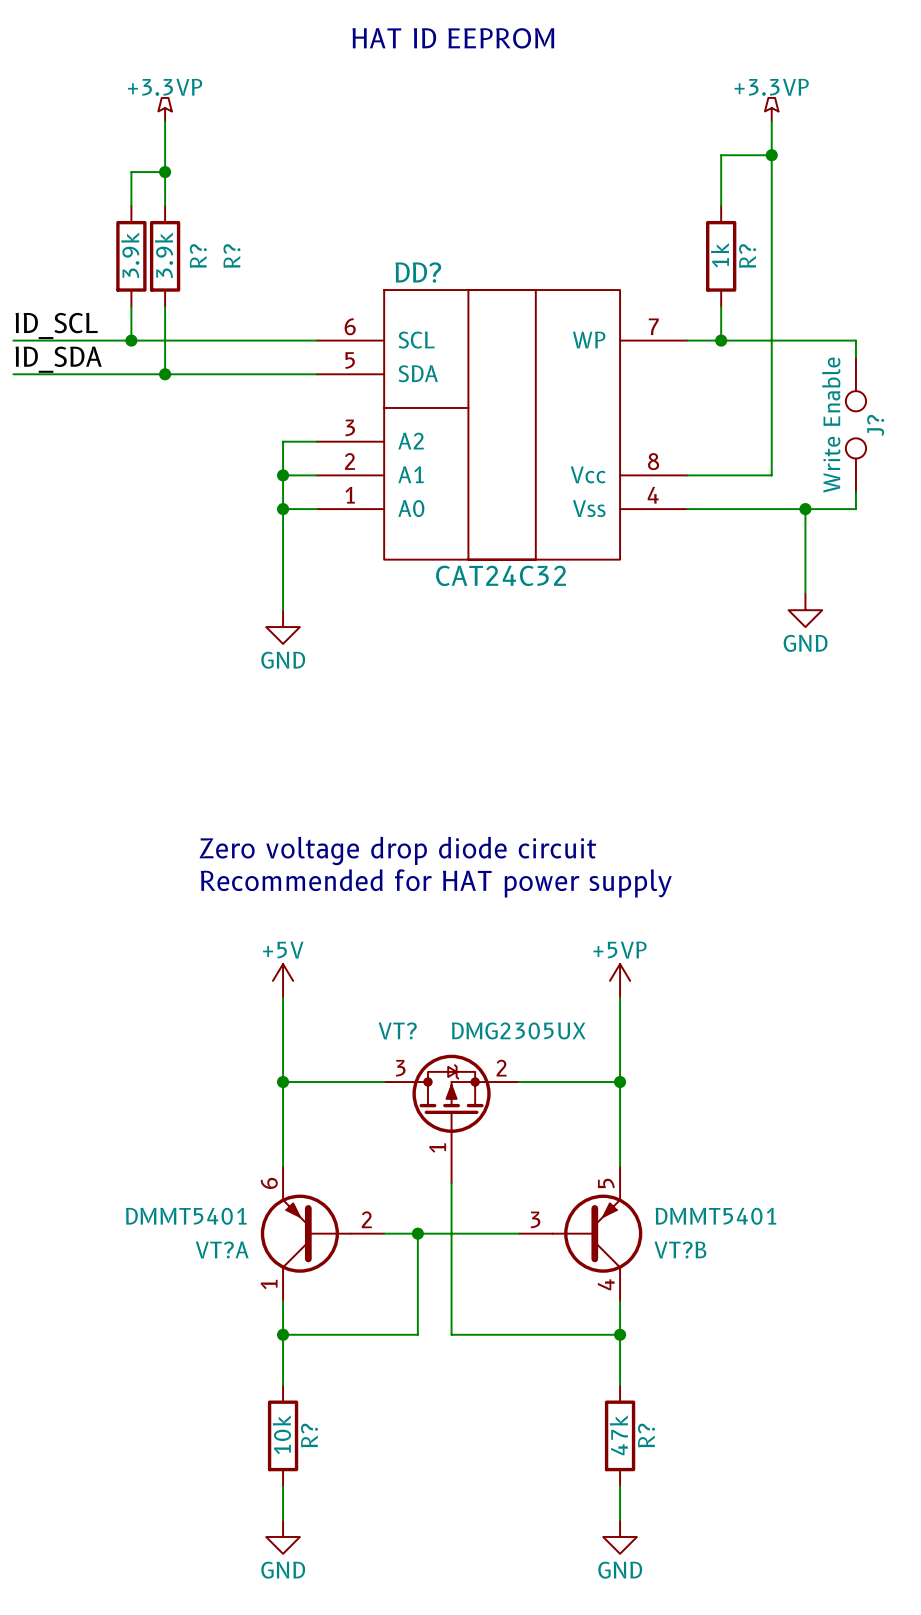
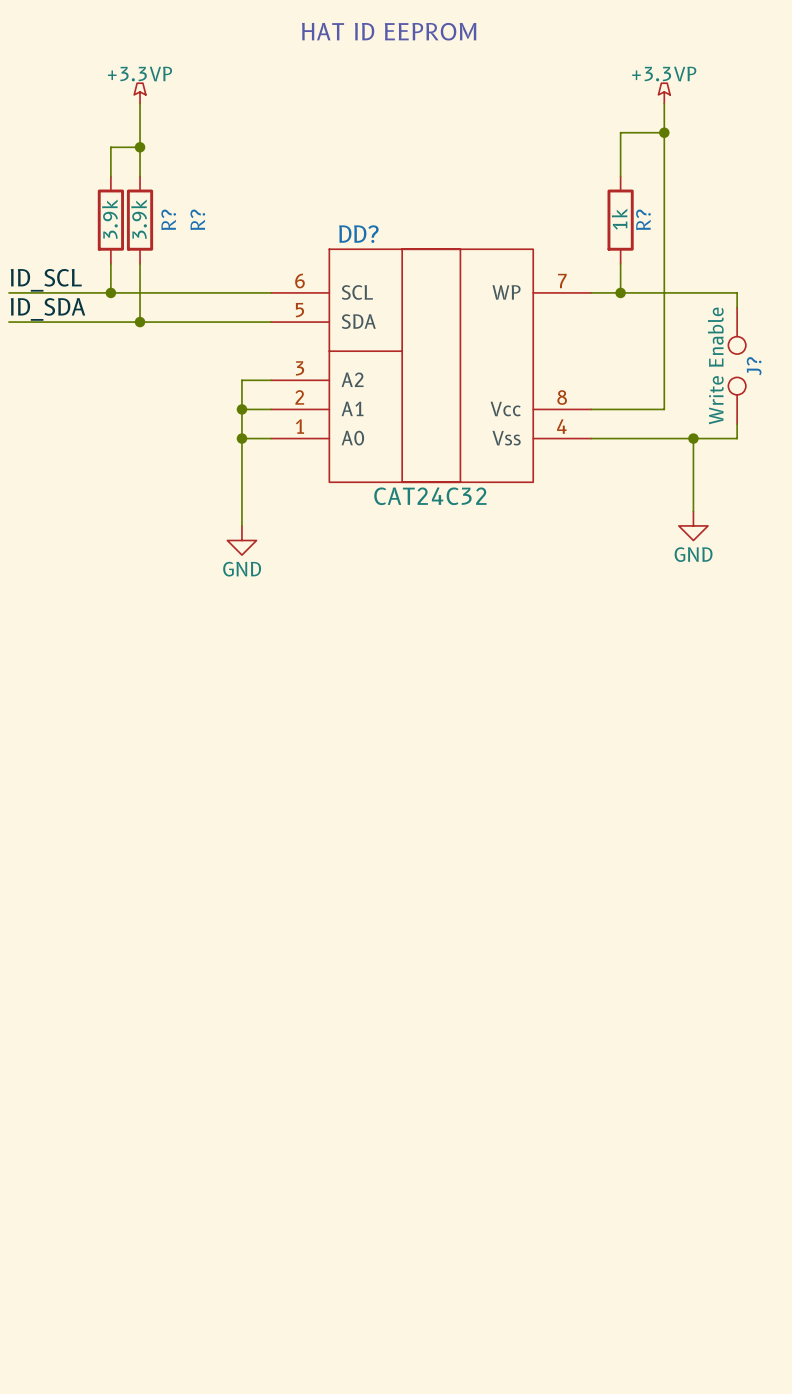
text: Zero voltage drop diode circuit (397, 850) -> none
text: Recommended for HAT power supply (436, 883) -> none
power symbol: +5V (283, 980) -> none
power symbol: +5VP (620, 980) -> none
wire: (283, 997) (283, 1166) -> none
wire: (620, 997) (620, 1166) -> none
wire: (283, 1082) (384, 1082) -> none
junction: (283, 1082) -> none
wire: (518, 1082) (620, 1082) -> none
junction: (620, 1082) -> none
VT?: DMG2305UX (451, 1118) -> none
wire: (451, 1183) (451, 1334) (620, 1334) -> none
VT?A: DMMT5401 (322, 1233) -> none
wire: (384, 1233) (518, 1233) -> none
wire: (417, 1233) (417, 1334) (283, 1334) -> none
junction: (417, 1233) -> none
VT?B: DMMT5401 (580, 1233) -> none
wire: (283, 1301) (283, 1385) -> none
wire: (620, 1301) (620, 1385) -> none
junction: (283, 1334) -> none
junction: (620, 1334) -> none
R?: 10k (283, 1435) -> none
R?: 47k (620, 1435) -> none
wire: (283, 1486) (283, 1520) -> none
wire: (620, 1486) (620, 1520) -> none
power symbol: GND (283, 1536) -> none
power symbol: GND (620, 1536) -> none

